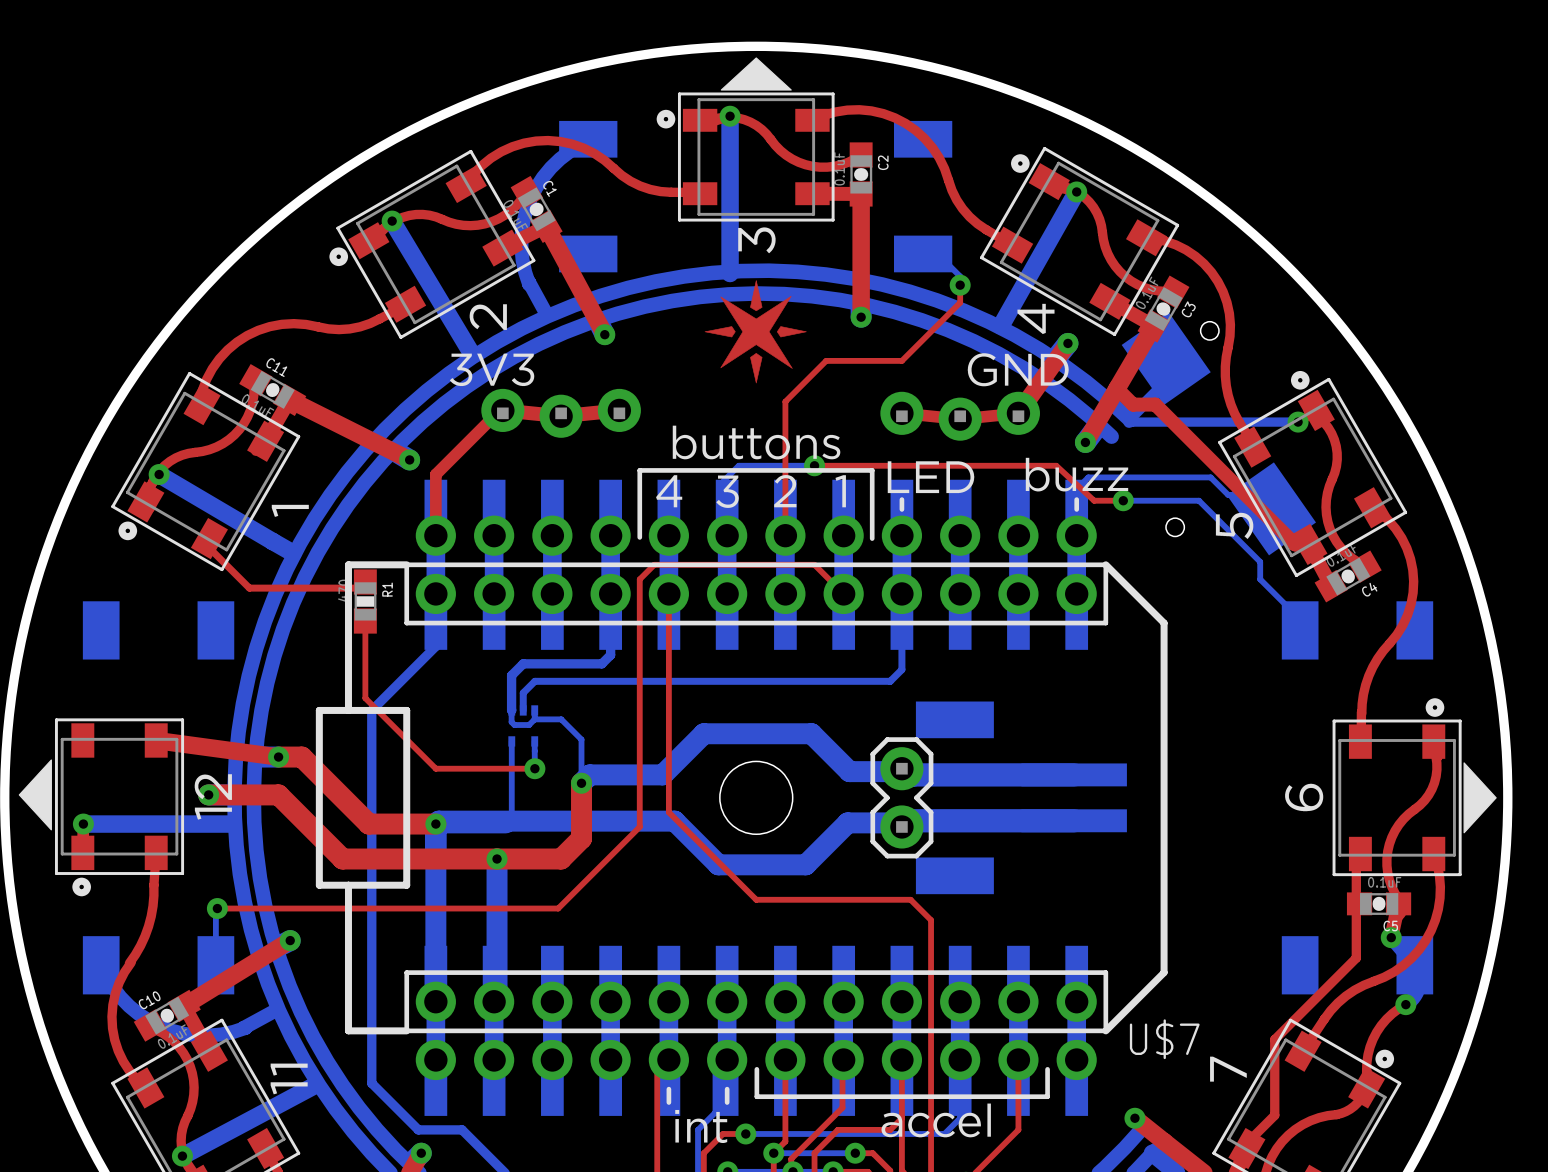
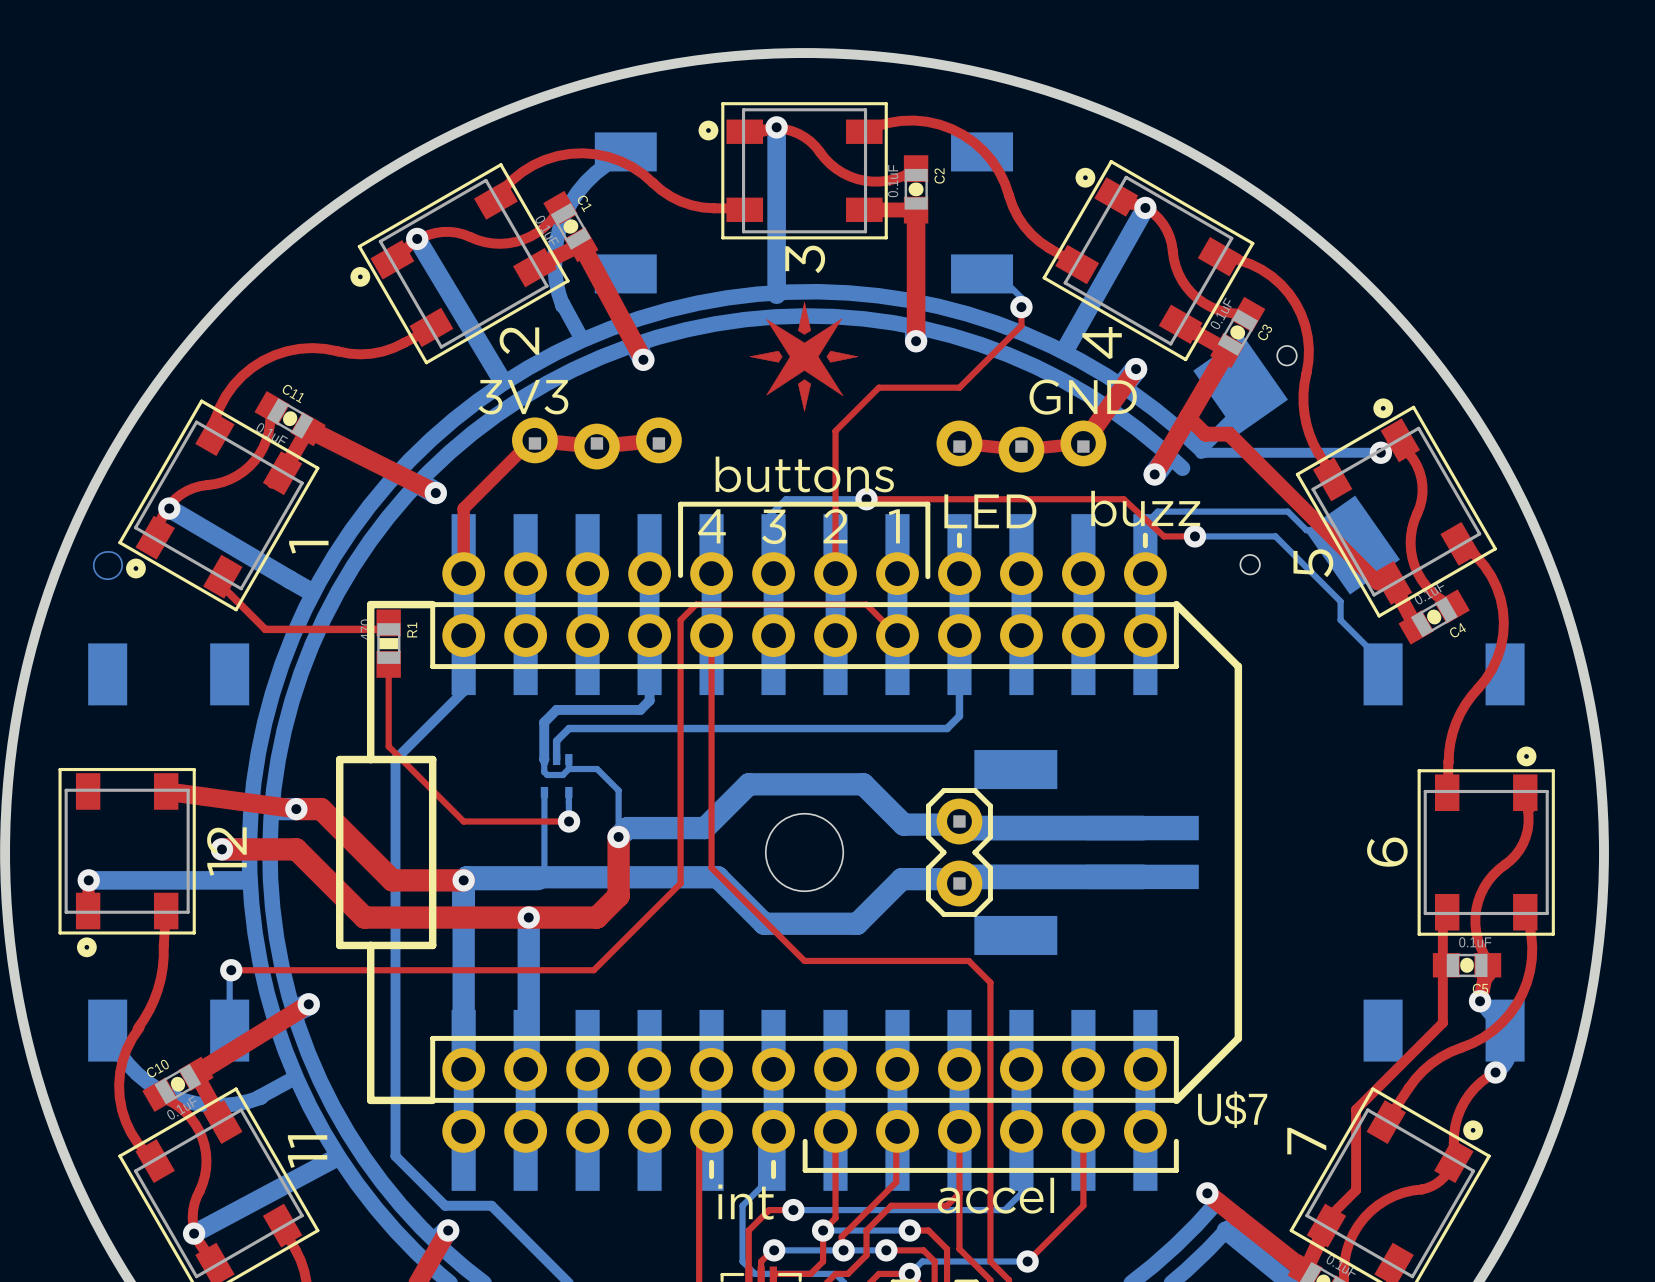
drawing: [720, 57, 792, 91] -> none
bottom zone outline: none -> (107, 551) (97, 555) (93, 567) (99, 576) (109, 579) (118, 574) (122, 563) (117, 554) (107, 551)
drawing: [18, 759, 52, 831] -> none
drawing: [1463, 762, 1497, 834] -> none
line: (1047, 1069) (1047, 1096) -> (1176, 1141) (1176, 1170) (1114, 1170)

